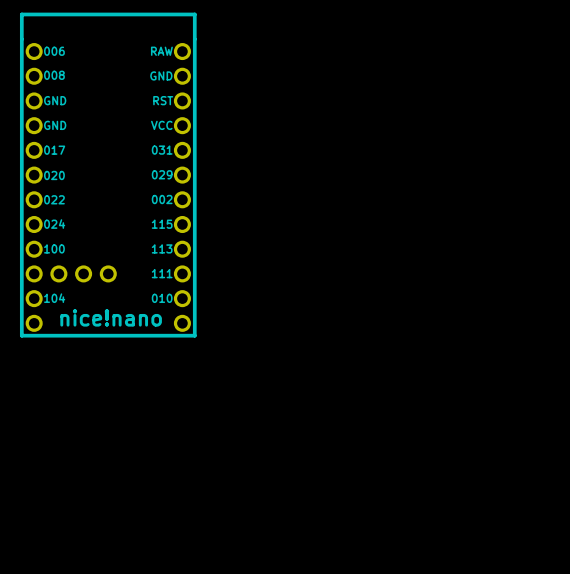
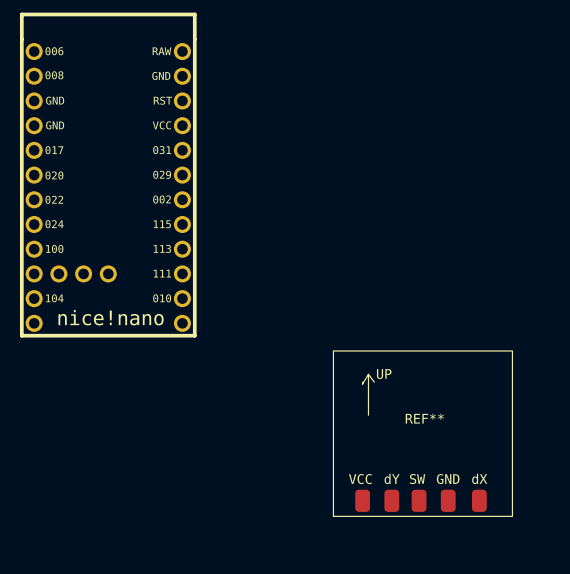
REF**: none -> (422, 433)

